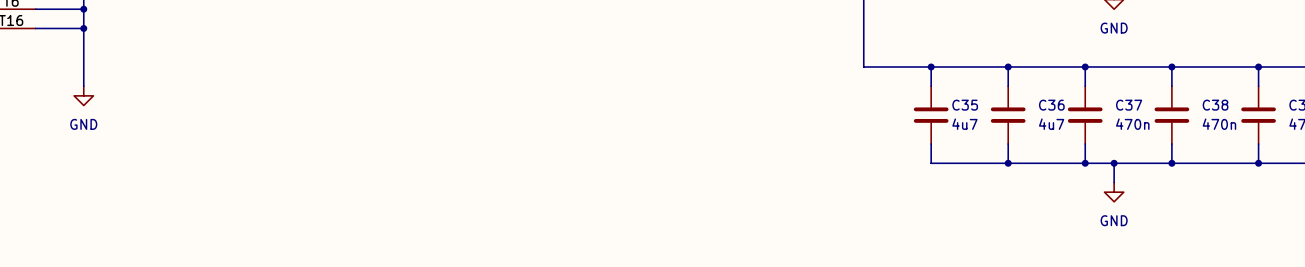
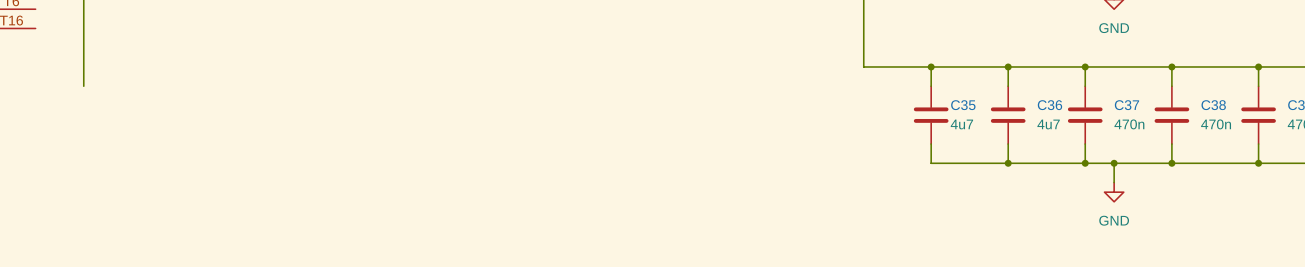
wire: (35, 9) (83, 9) -> none
junction: (83, 9) -> none
wire: (35, 28) (83, 28) -> none
junction: (83, 28) -> none
power symbol: GND (83, 95) -> none

